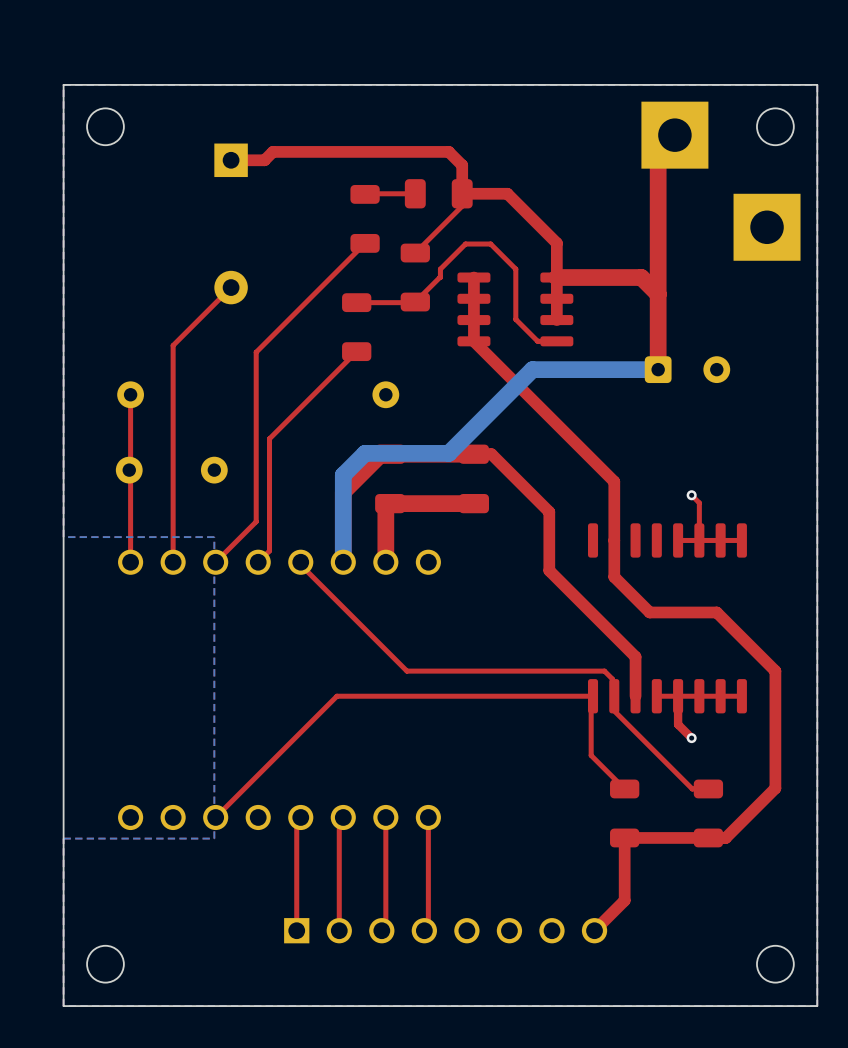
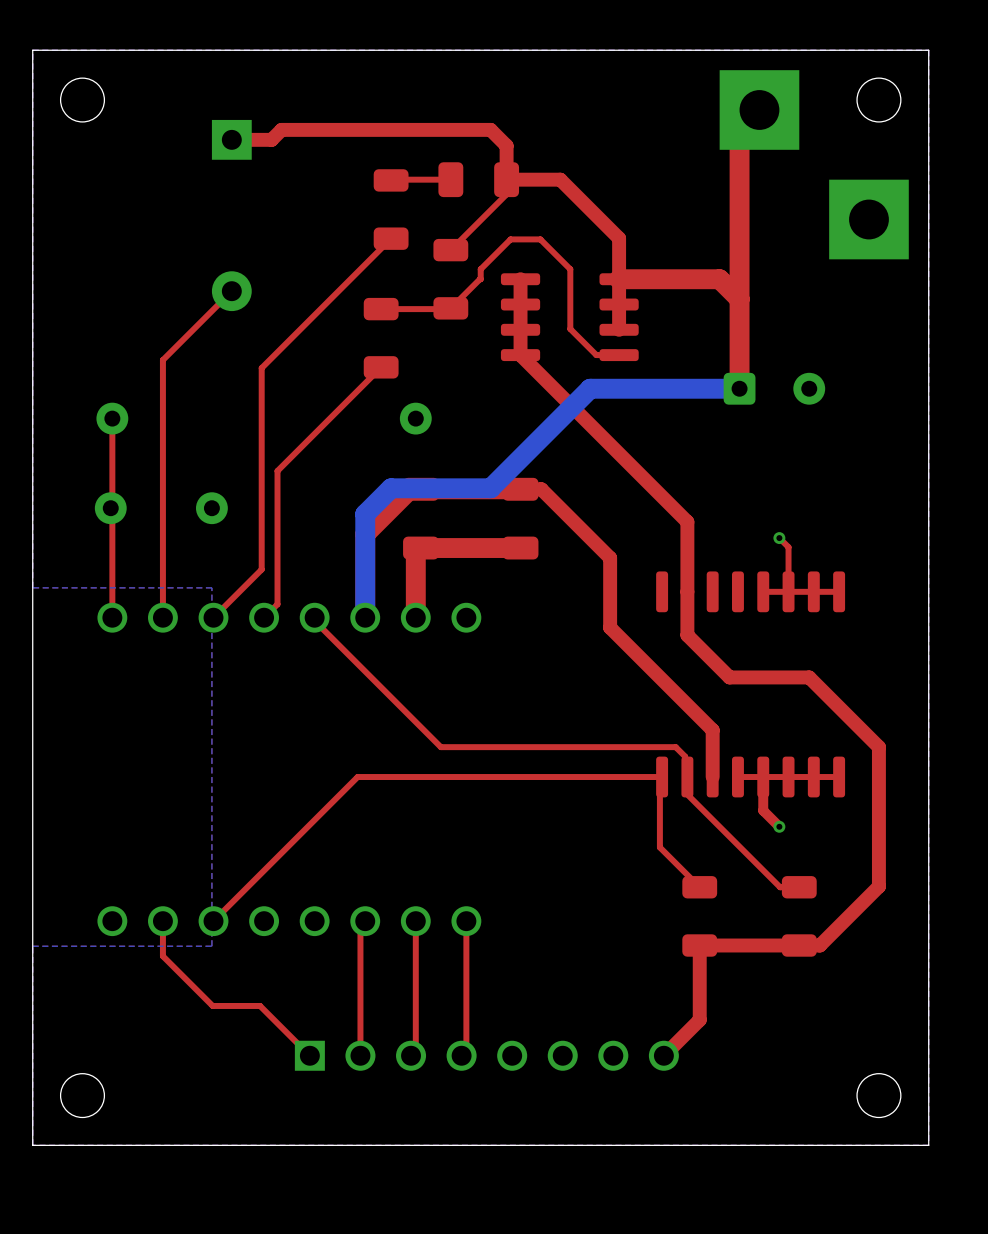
top track: (296, 821) (296, 930) -> (162, 921) (162, 956) (212, 1005) (260, 1005) (309, 1055)

